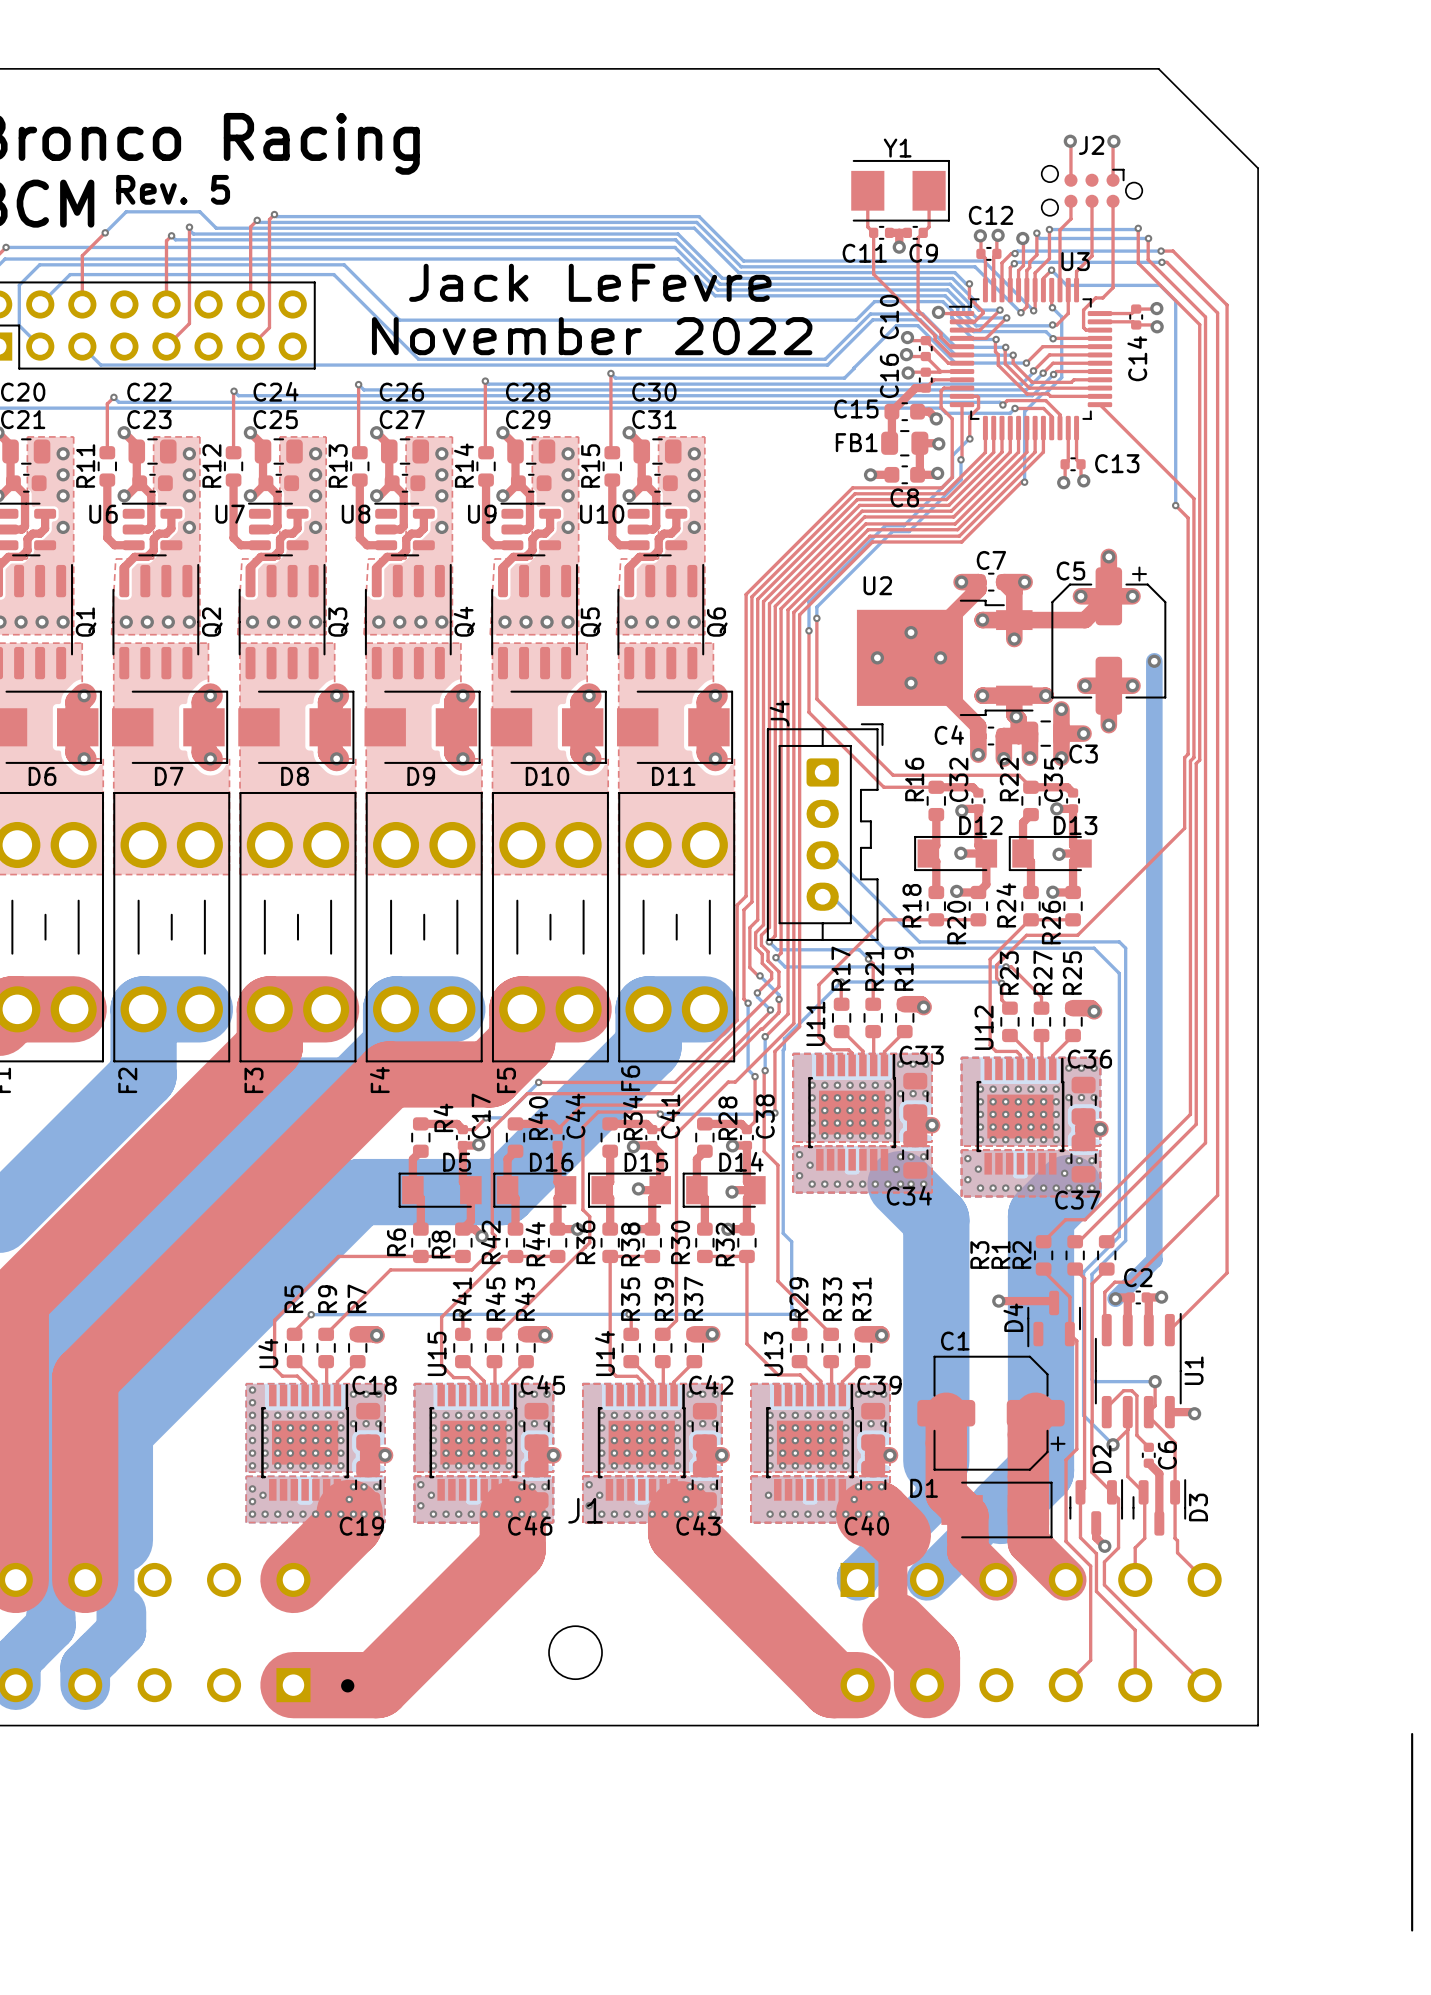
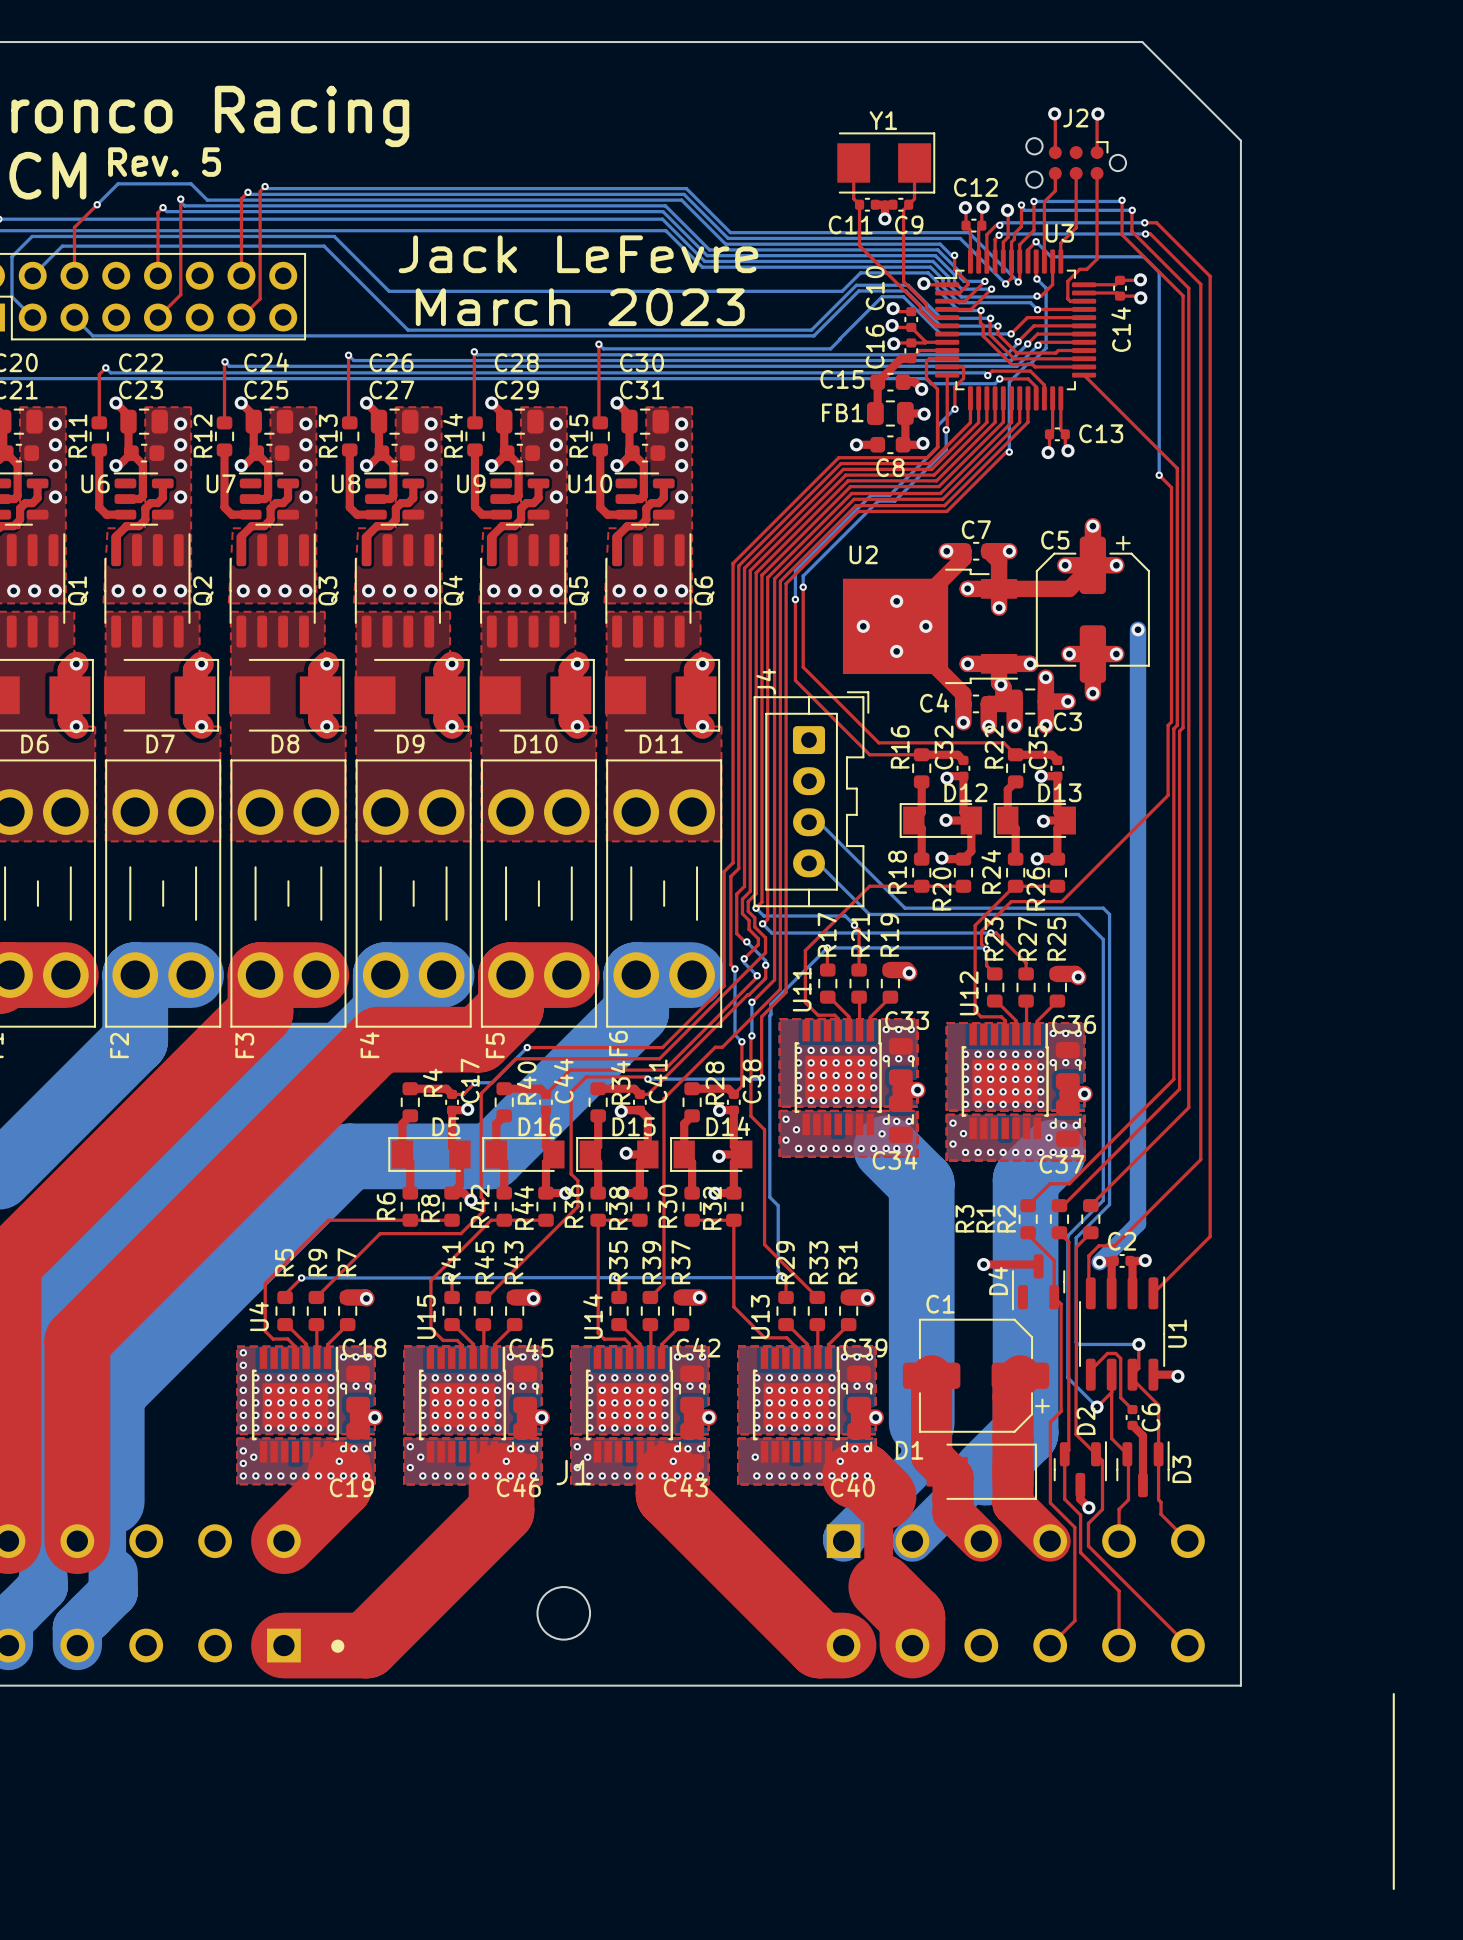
text: November 2022 (592, 336) -> March 2023 (580, 307)
top track: (925, 340) (948, 363) (962, 363) -> none

